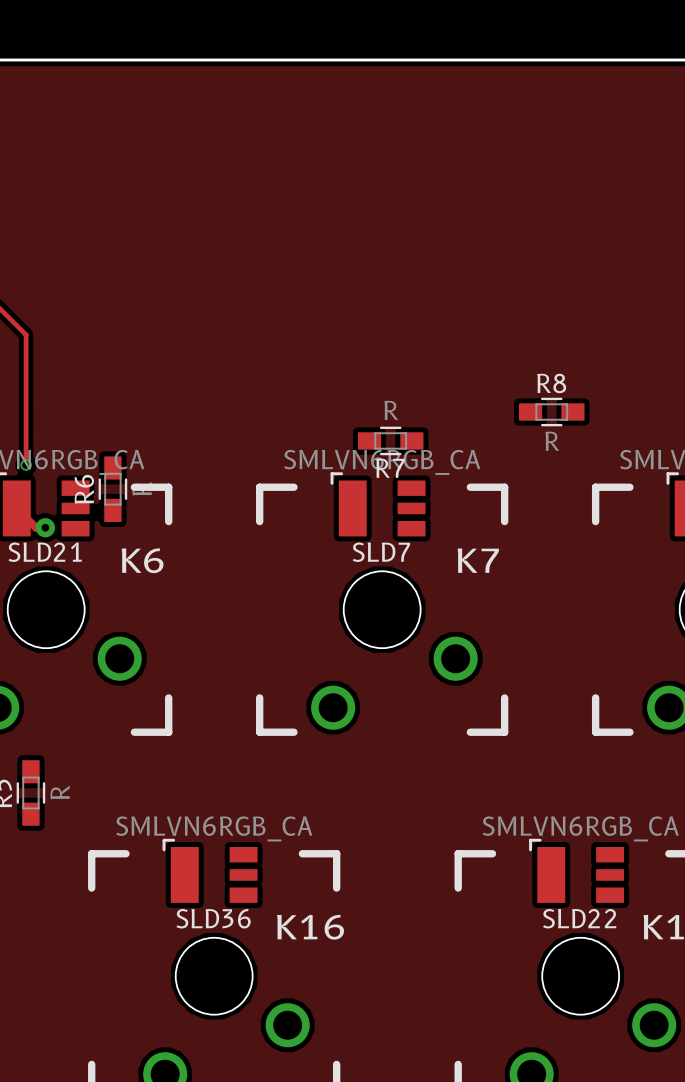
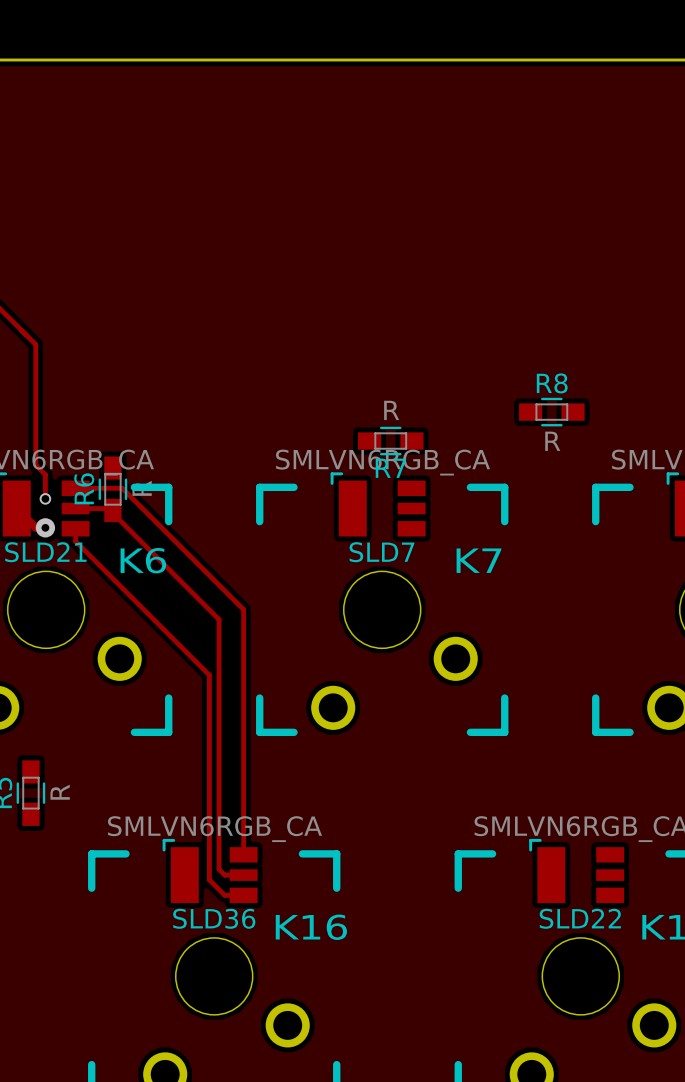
track: (26, 334) (26, 465) -> (26, 334) (35, 344) (35, 465) (45, 474) (45, 498)
via position: (26, 465) -> (45, 498)
track: none -> (75, 488) (122, 488) (243, 609) (243, 854)
track: none -> (75, 508) (111, 508) (112, 513) (219, 619) (219, 869) (224, 875) (243, 875)
track: none -> (75, 528) (75, 541) (209, 675) (209, 879) (224, 895) (243, 895)

